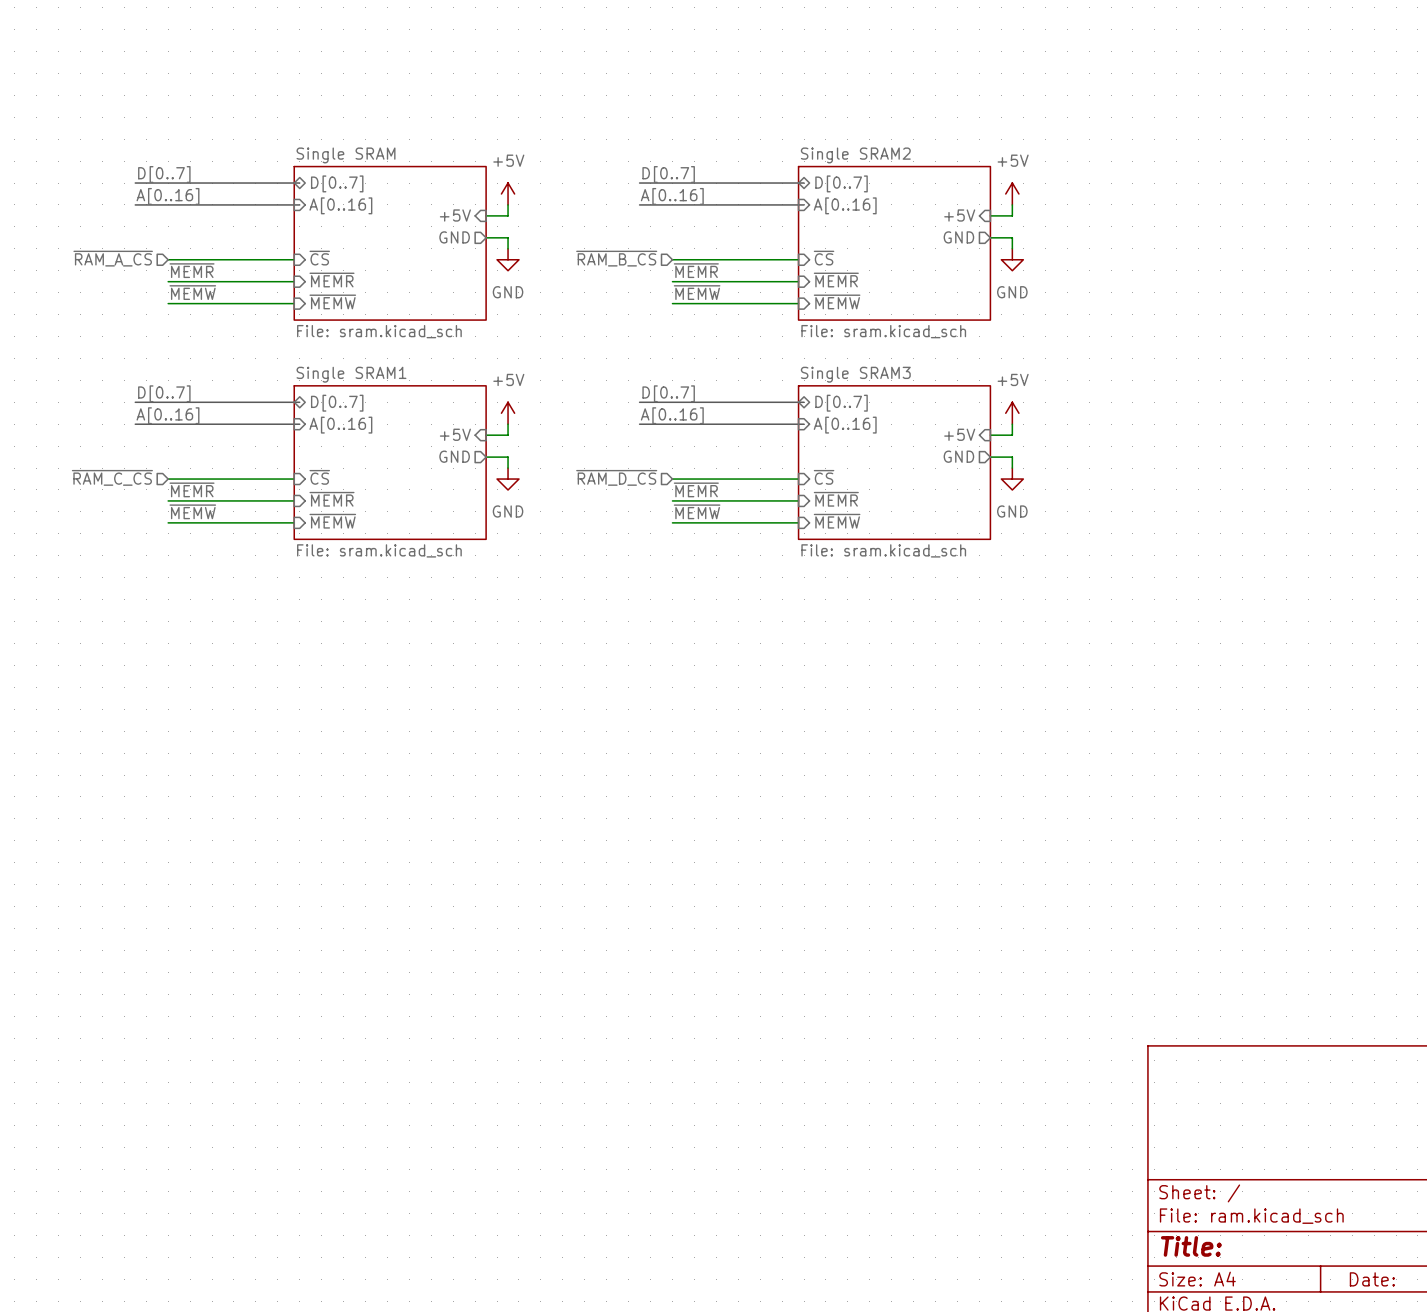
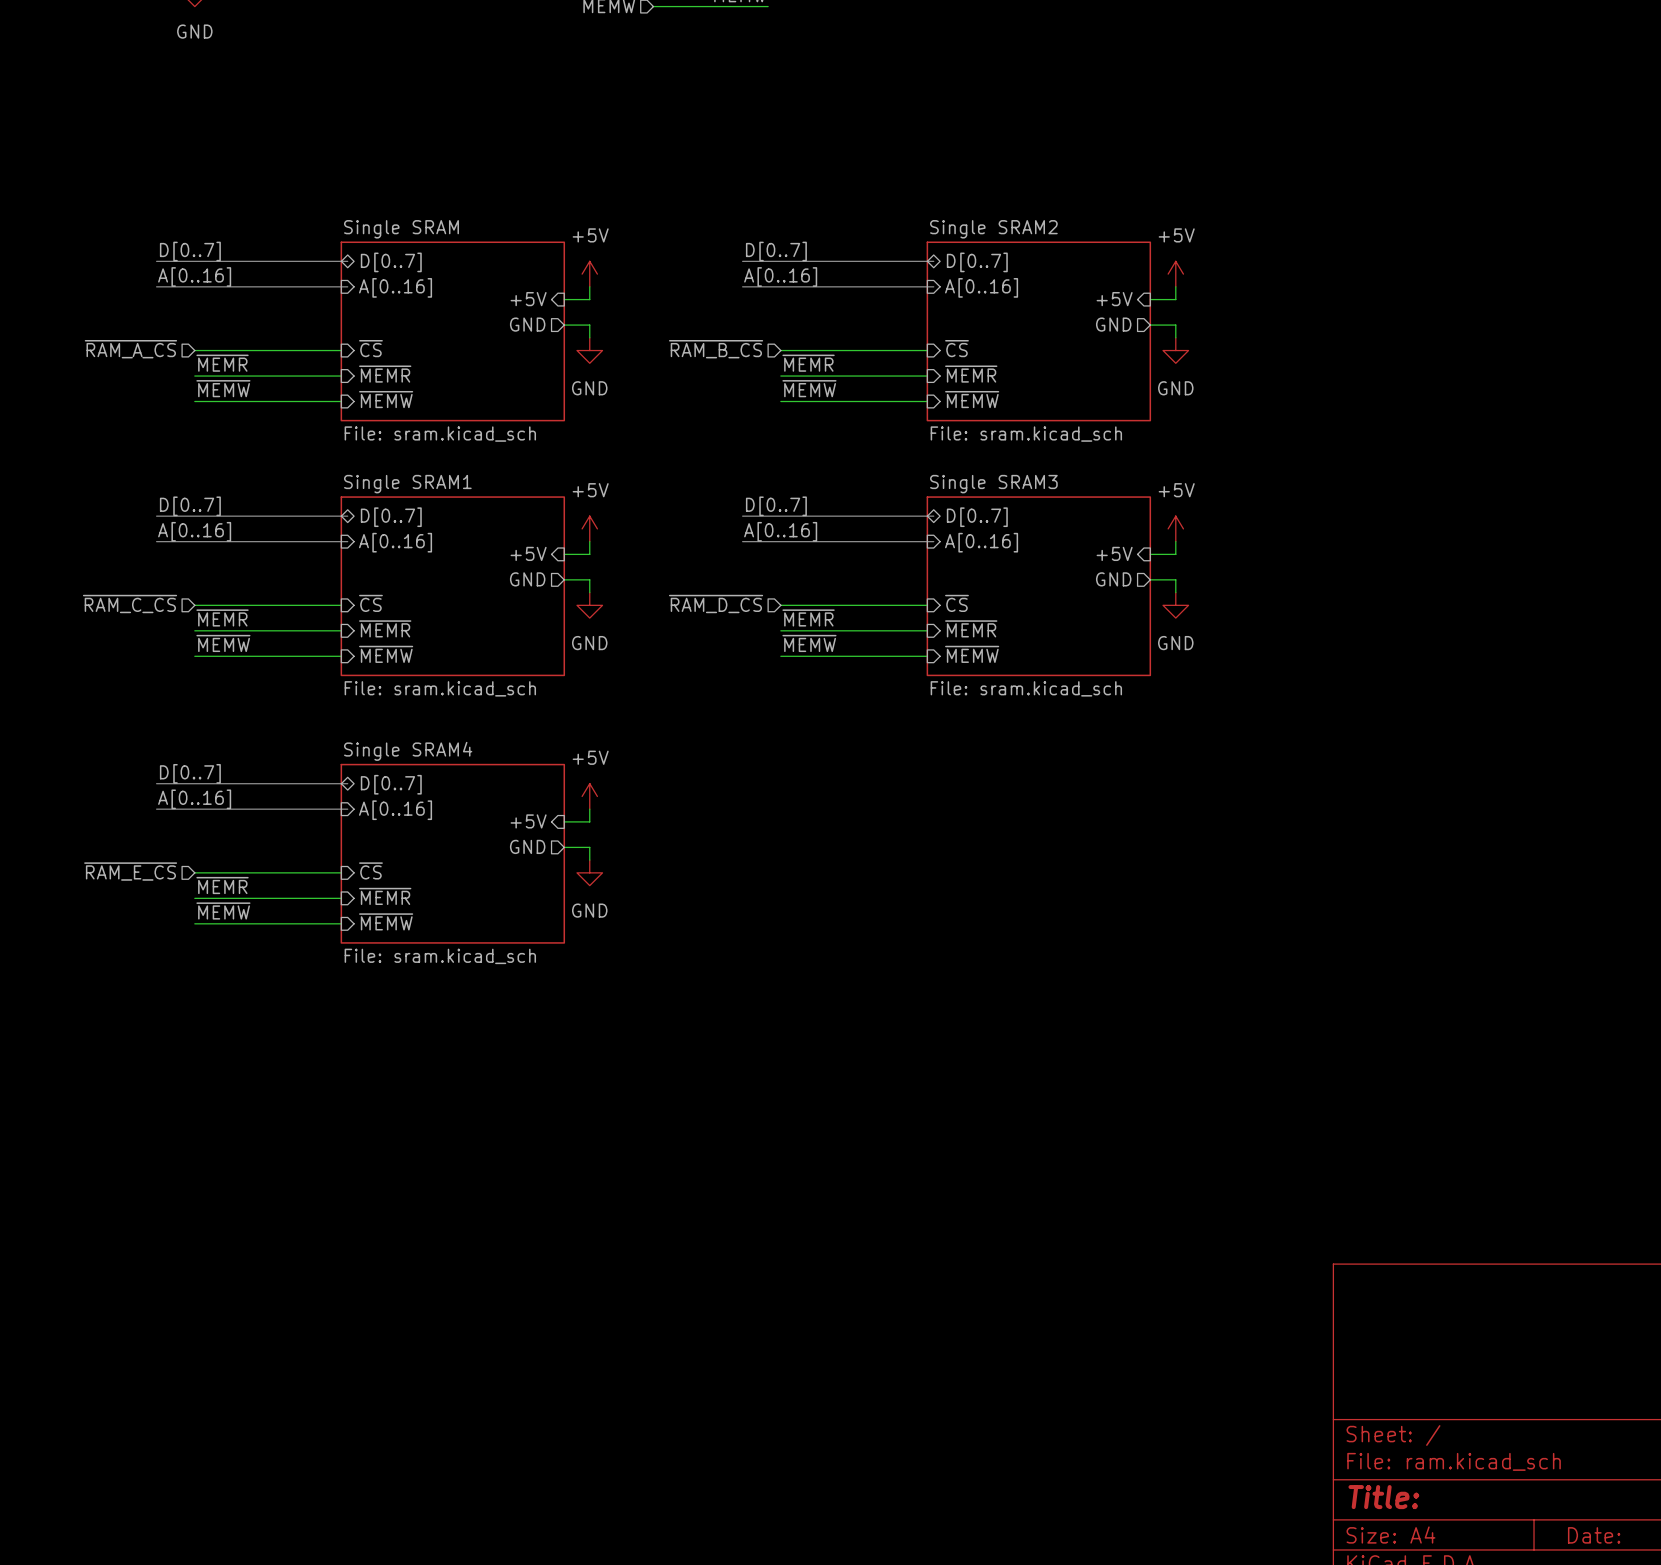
label: none -> D[0..7] (190, 773)
bus: none -> (156, 783) (347, 783)
sheet pin: none -> D[0..7] (391, 784)
power symbol: none -> +5V (589, 796)
label: none -> A[0..16] (194, 799)
bus: none -> (156, 809) (347, 809)
wire: none -> (589, 809) (589, 821) (564, 821)
sheet pin: none -> A[0..16] (395, 810)
sheet pin: none -> +5V (528, 821)
sheet pin: none -> GND (527, 846)
wire: none -> (564, 847) (589, 847) (589, 860)
sheet Single SRAM4: none -> File: sram.kicad_sch (452, 853)
sheet pin: none -> ~{CS} (370, 870)
hierarchical label: none -> ~{RAM_E_CS} (130, 871)
wire: none -> (194, 872) (341, 872)
power symbol: none -> GND (589, 872)
label: none -> ~{MEMR} (222, 885)
sheet pin: none -> ~{MEMR} (385, 896)
wire: none -> (194, 898) (341, 898)
label: none -> ~{MEMW} (223, 911)
sheet pin: none -> ~{MEMW} (386, 921)
wire: none -> (194, 923) (341, 923)

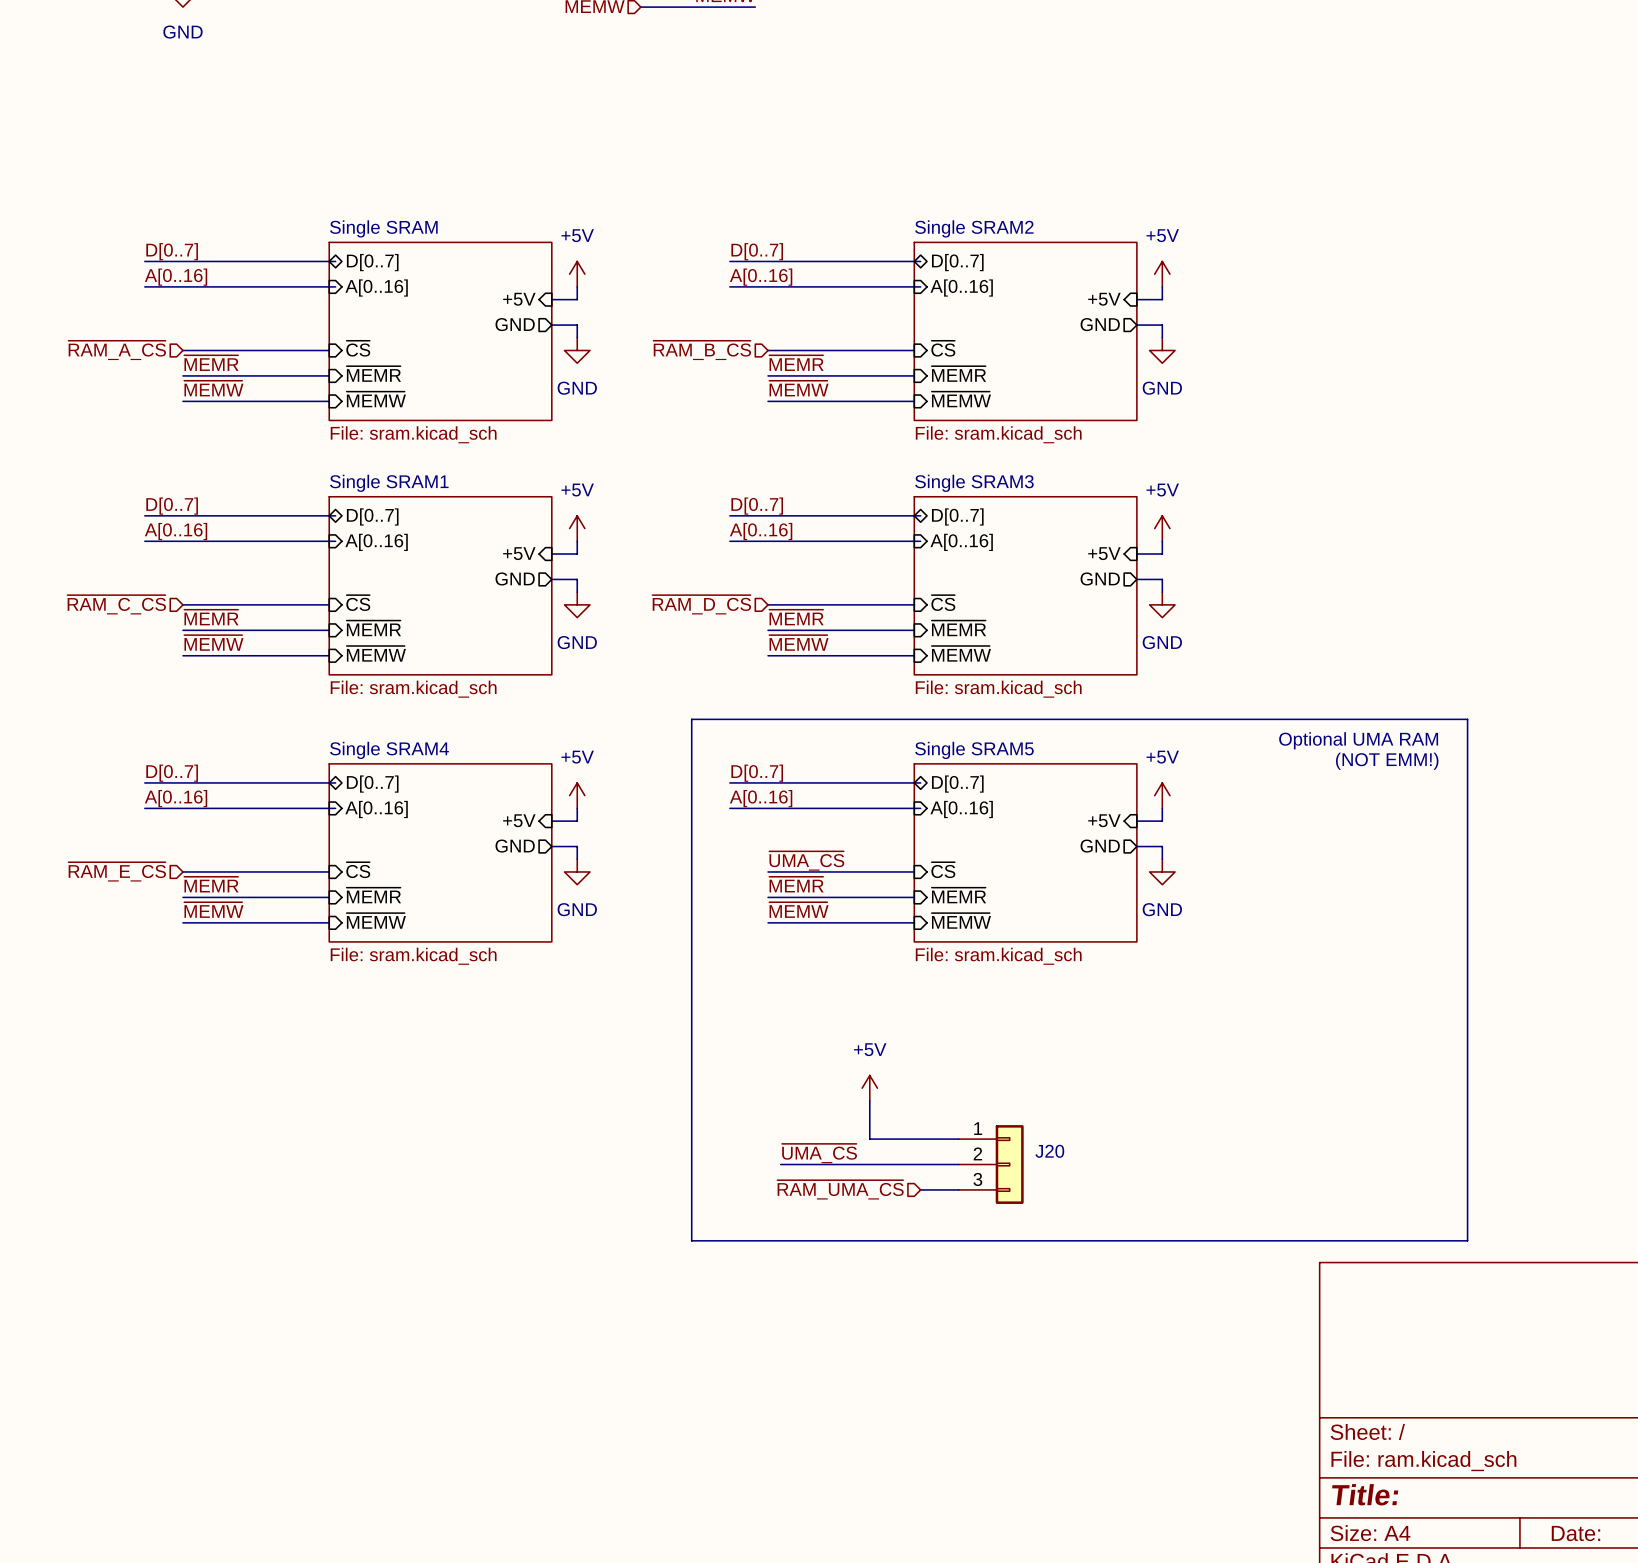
line: none -> (691, 719) (1467, 719) (1467, 1240) (691, 1240) (691, 719)
text: none -> Optional UMA RAM (1358, 740)
text: none -> (NOT EMM!) (1387, 761)
label: none -> D[0..7] (757, 773)
bus: none -> (729, 782) (920, 782)
sheet pin: none -> D[0..7] (957, 784)
power symbol: none -> +5V (1162, 795)
label: none -> A[0..16] (761, 798)
bus: none -> (729, 808) (920, 808)
wire: none -> (1162, 808) (1162, 821) (1136, 821)
sheet pin: none -> A[0..16] (961, 809)
sheet pin: none -> +5V (1104, 820)
sheet pin: none -> GND (1100, 846)
wire: none -> (1136, 846) (1162, 846) (1162, 859)
sheet Single SRAM5: none -> File: sram.kicad_sch (1025, 852)
label: none -> ~{UMA_CS} (806, 861)
sheet pin: none -> ~{CS} (943, 870)
wire: none -> (768, 871) (914, 871)
power symbol: none -> GND (1162, 871)
label: none -> ~{MEMR} (796, 884)
sheet pin: none -> ~{MEMR} (958, 895)
wire: none -> (768, 897) (914, 897)
label: none -> ~{MEMW} (798, 910)
sheet pin: none -> ~{MEMW} (961, 920)
wire: none -> (768, 922) (914, 922)
power symbol: none -> +5V (869, 1088)
wire: none -> (869, 1100) (869, 1139) (958, 1139)
label: none -> ~{UMA_CS} (819, 1153)
wire: none -> (780, 1164) (958, 1164)
J20: none -> (991, 1164)
hierarchical label: none -> ~{RAM_UMA_CS} (840, 1189)
wire: none -> (920, 1189) (958, 1189)

